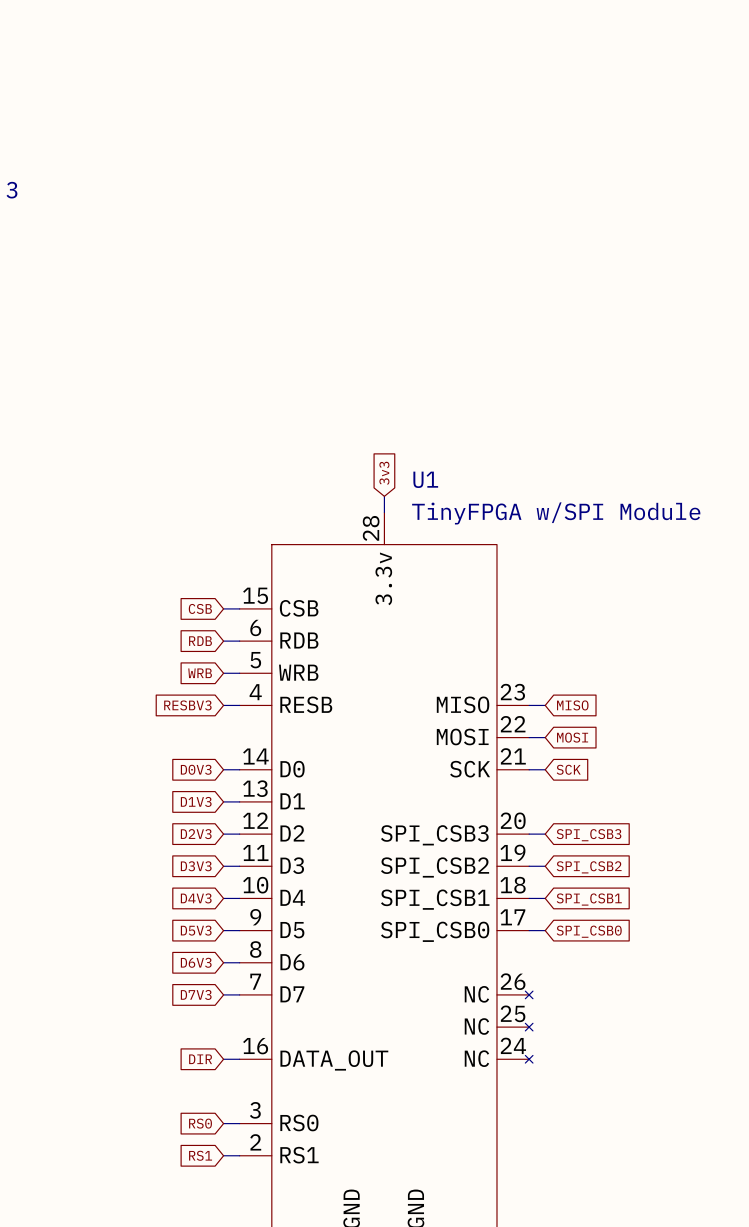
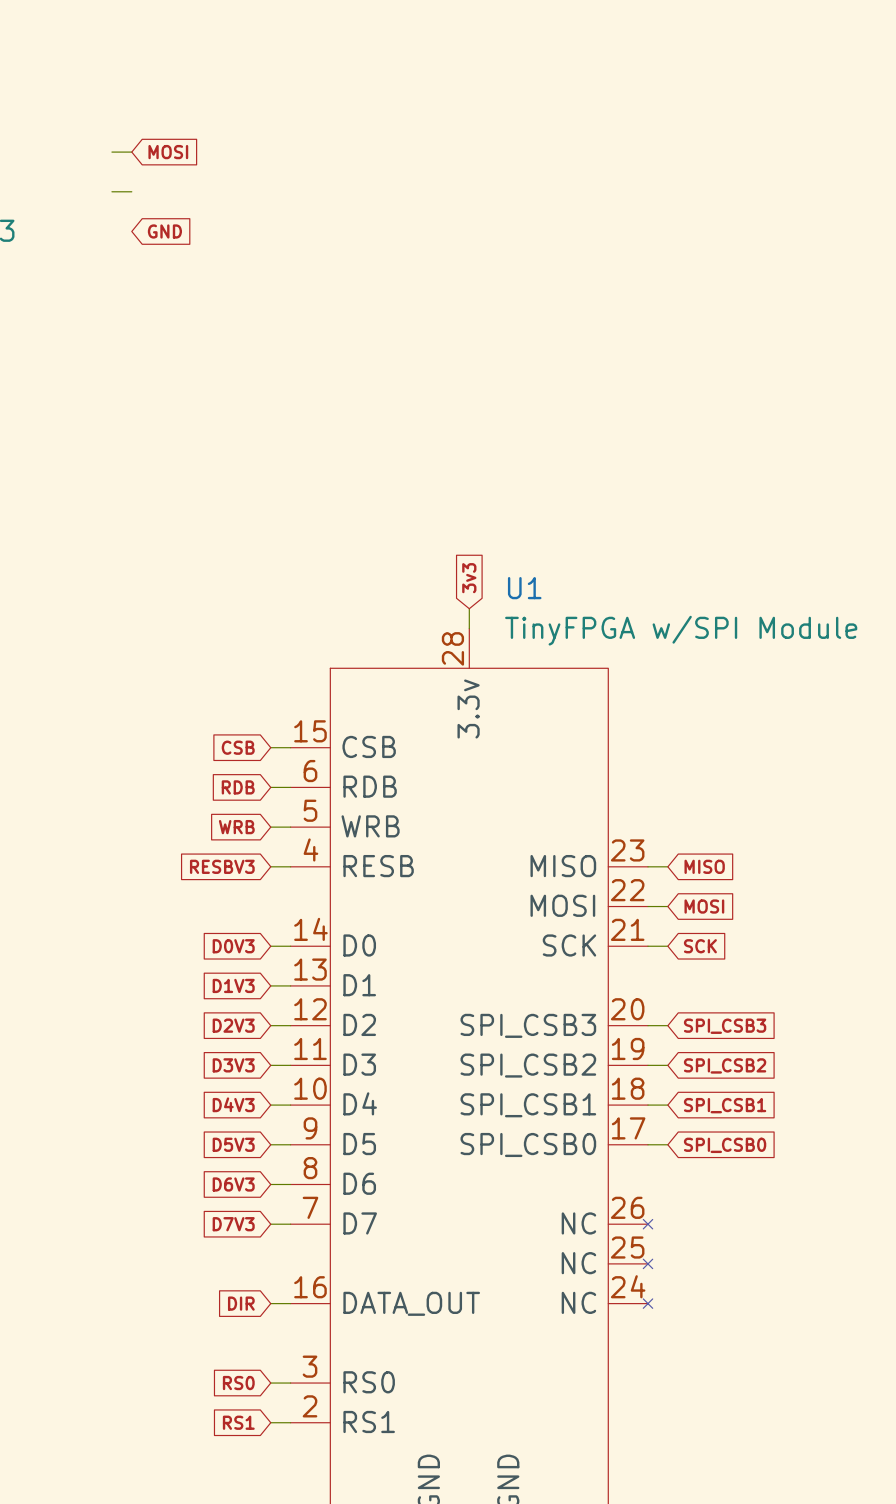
wire: none -> (111, 152) (131, 152)
global label: none -> MOSI (168, 152)
wire: none -> (111, 191) (131, 191)
global label: none -> GND (164, 231)

